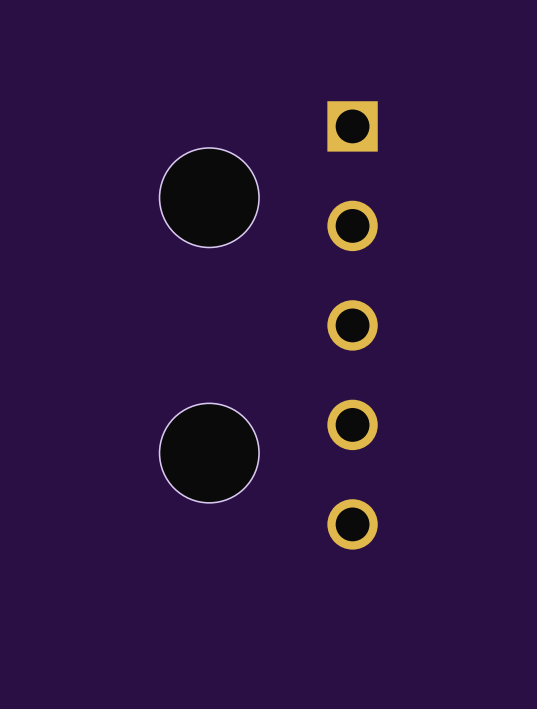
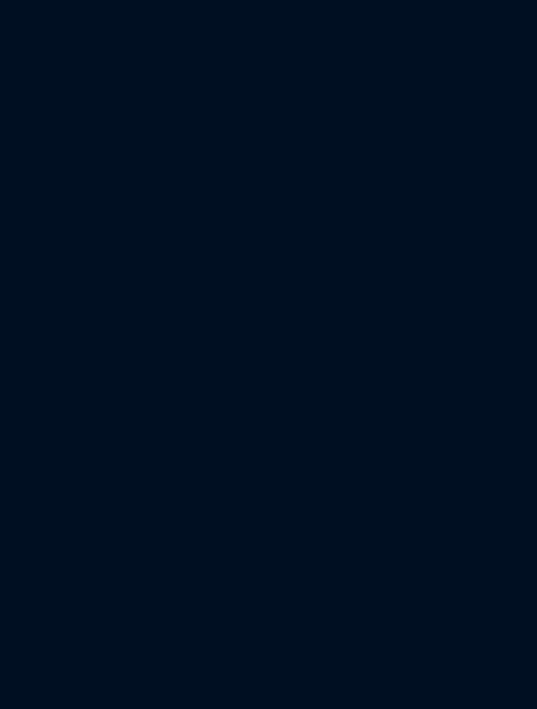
part: (268, 325) -> none

